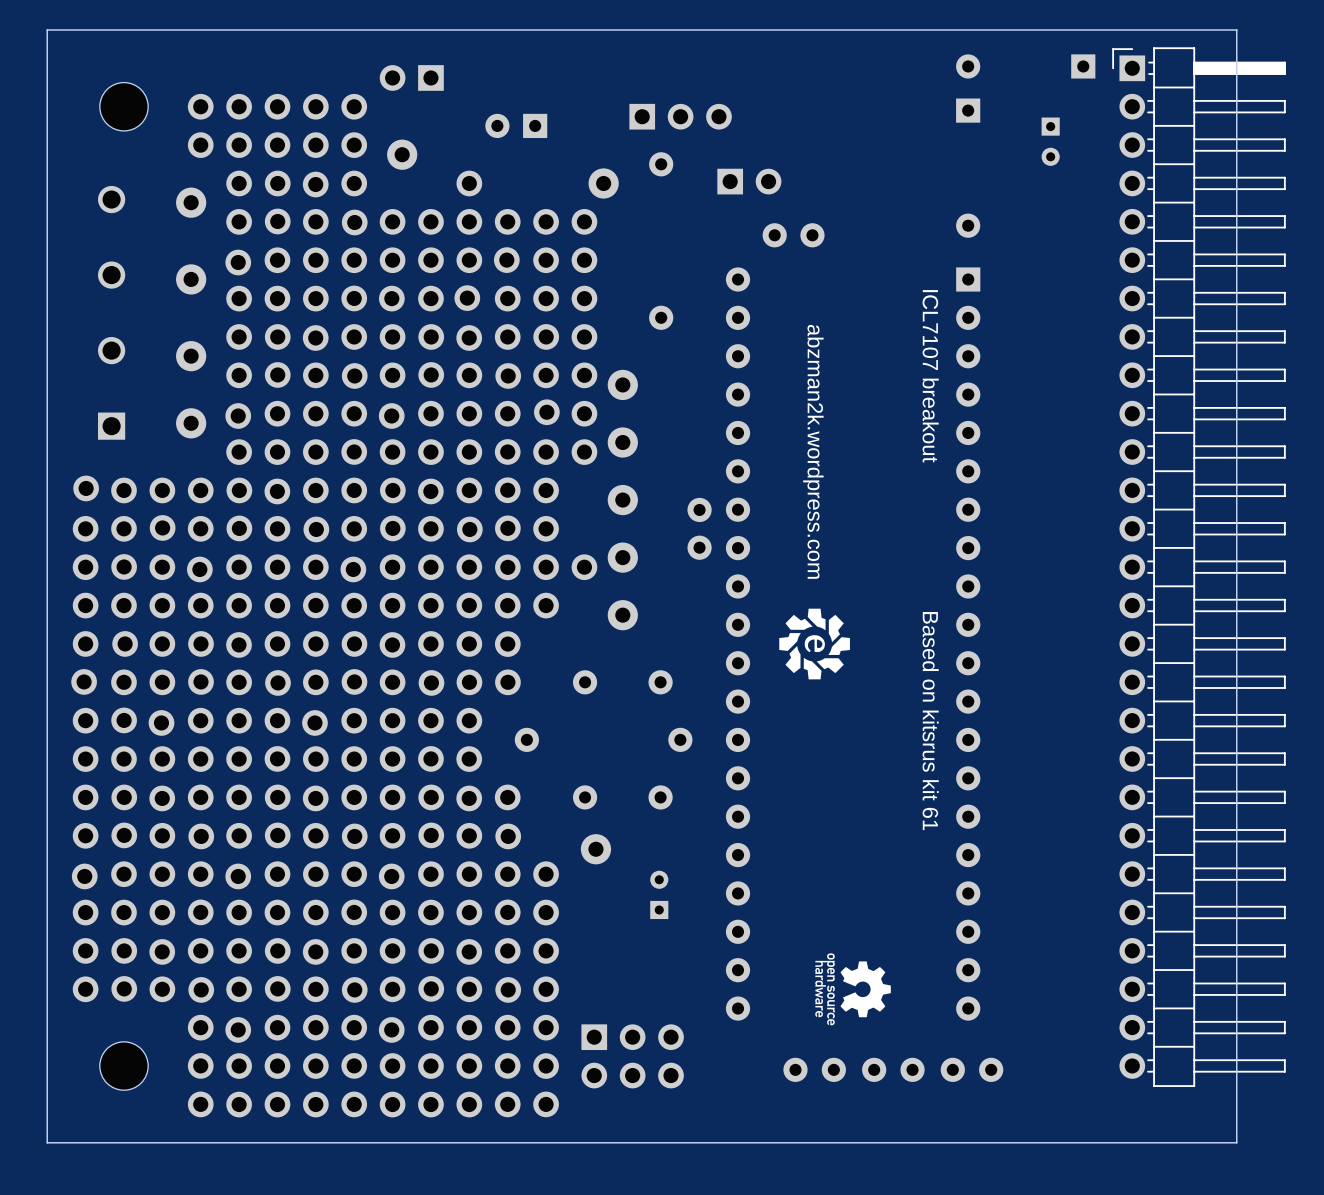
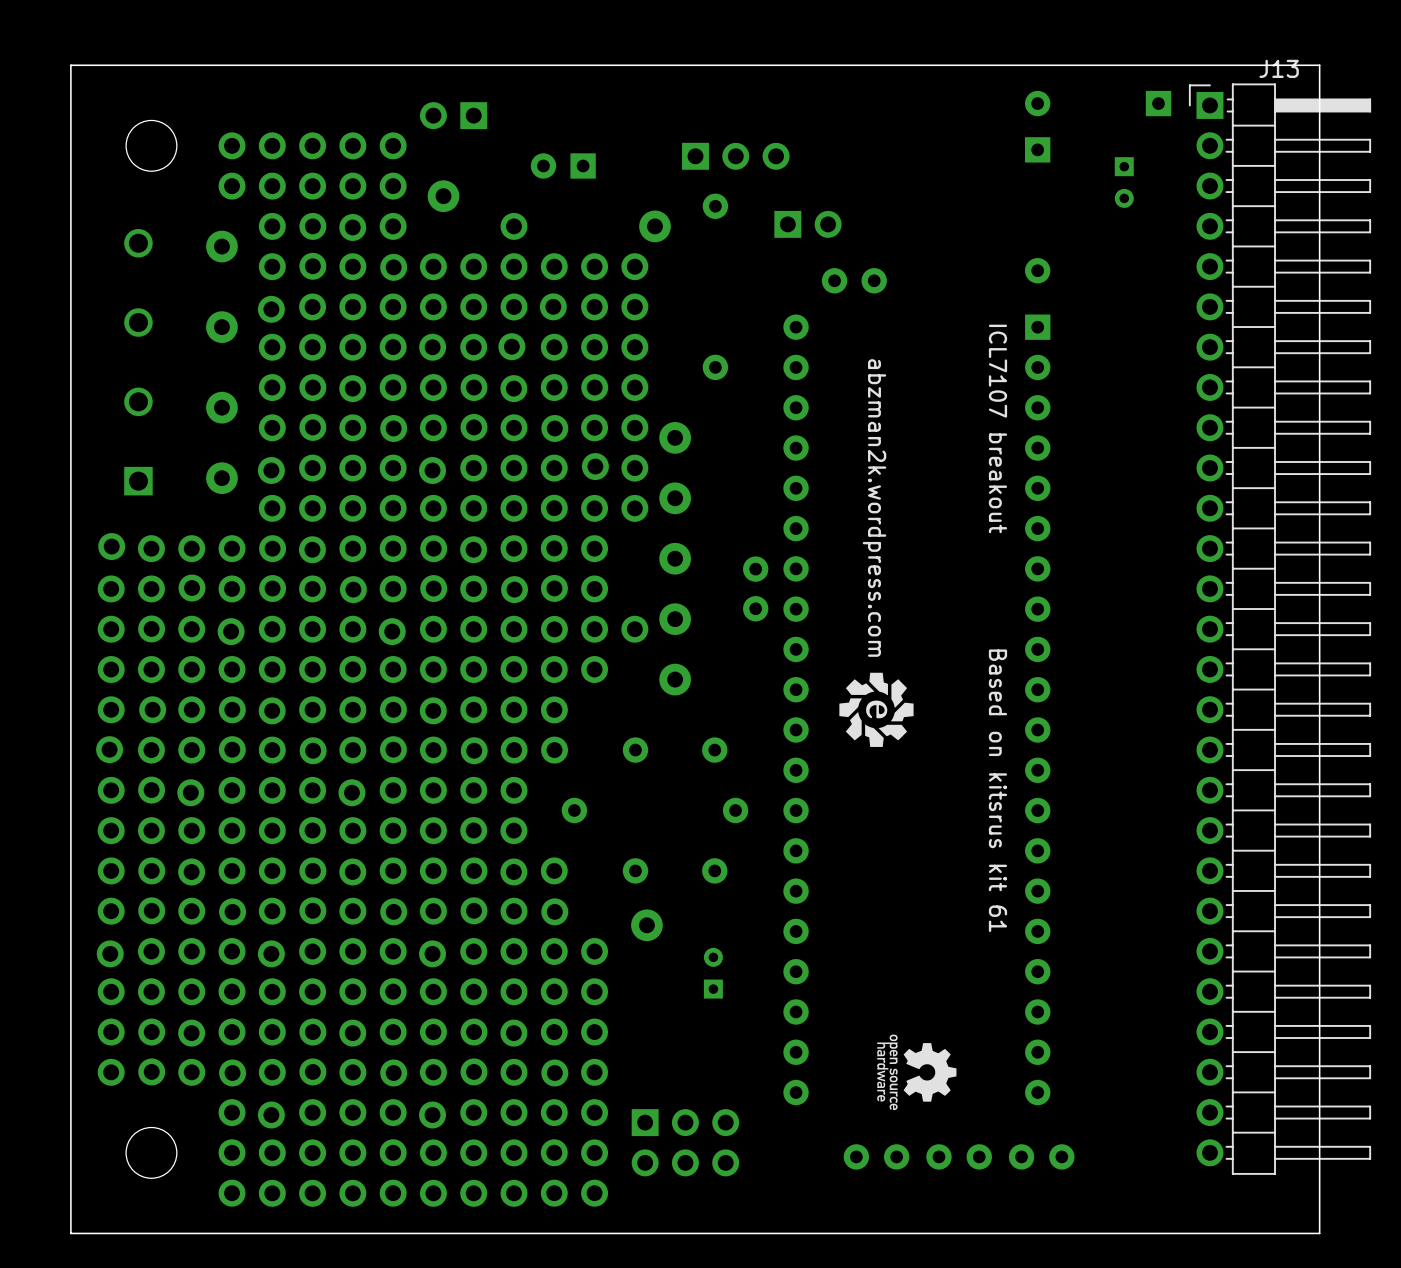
J13 name: none -> J13 (1279, 68)

